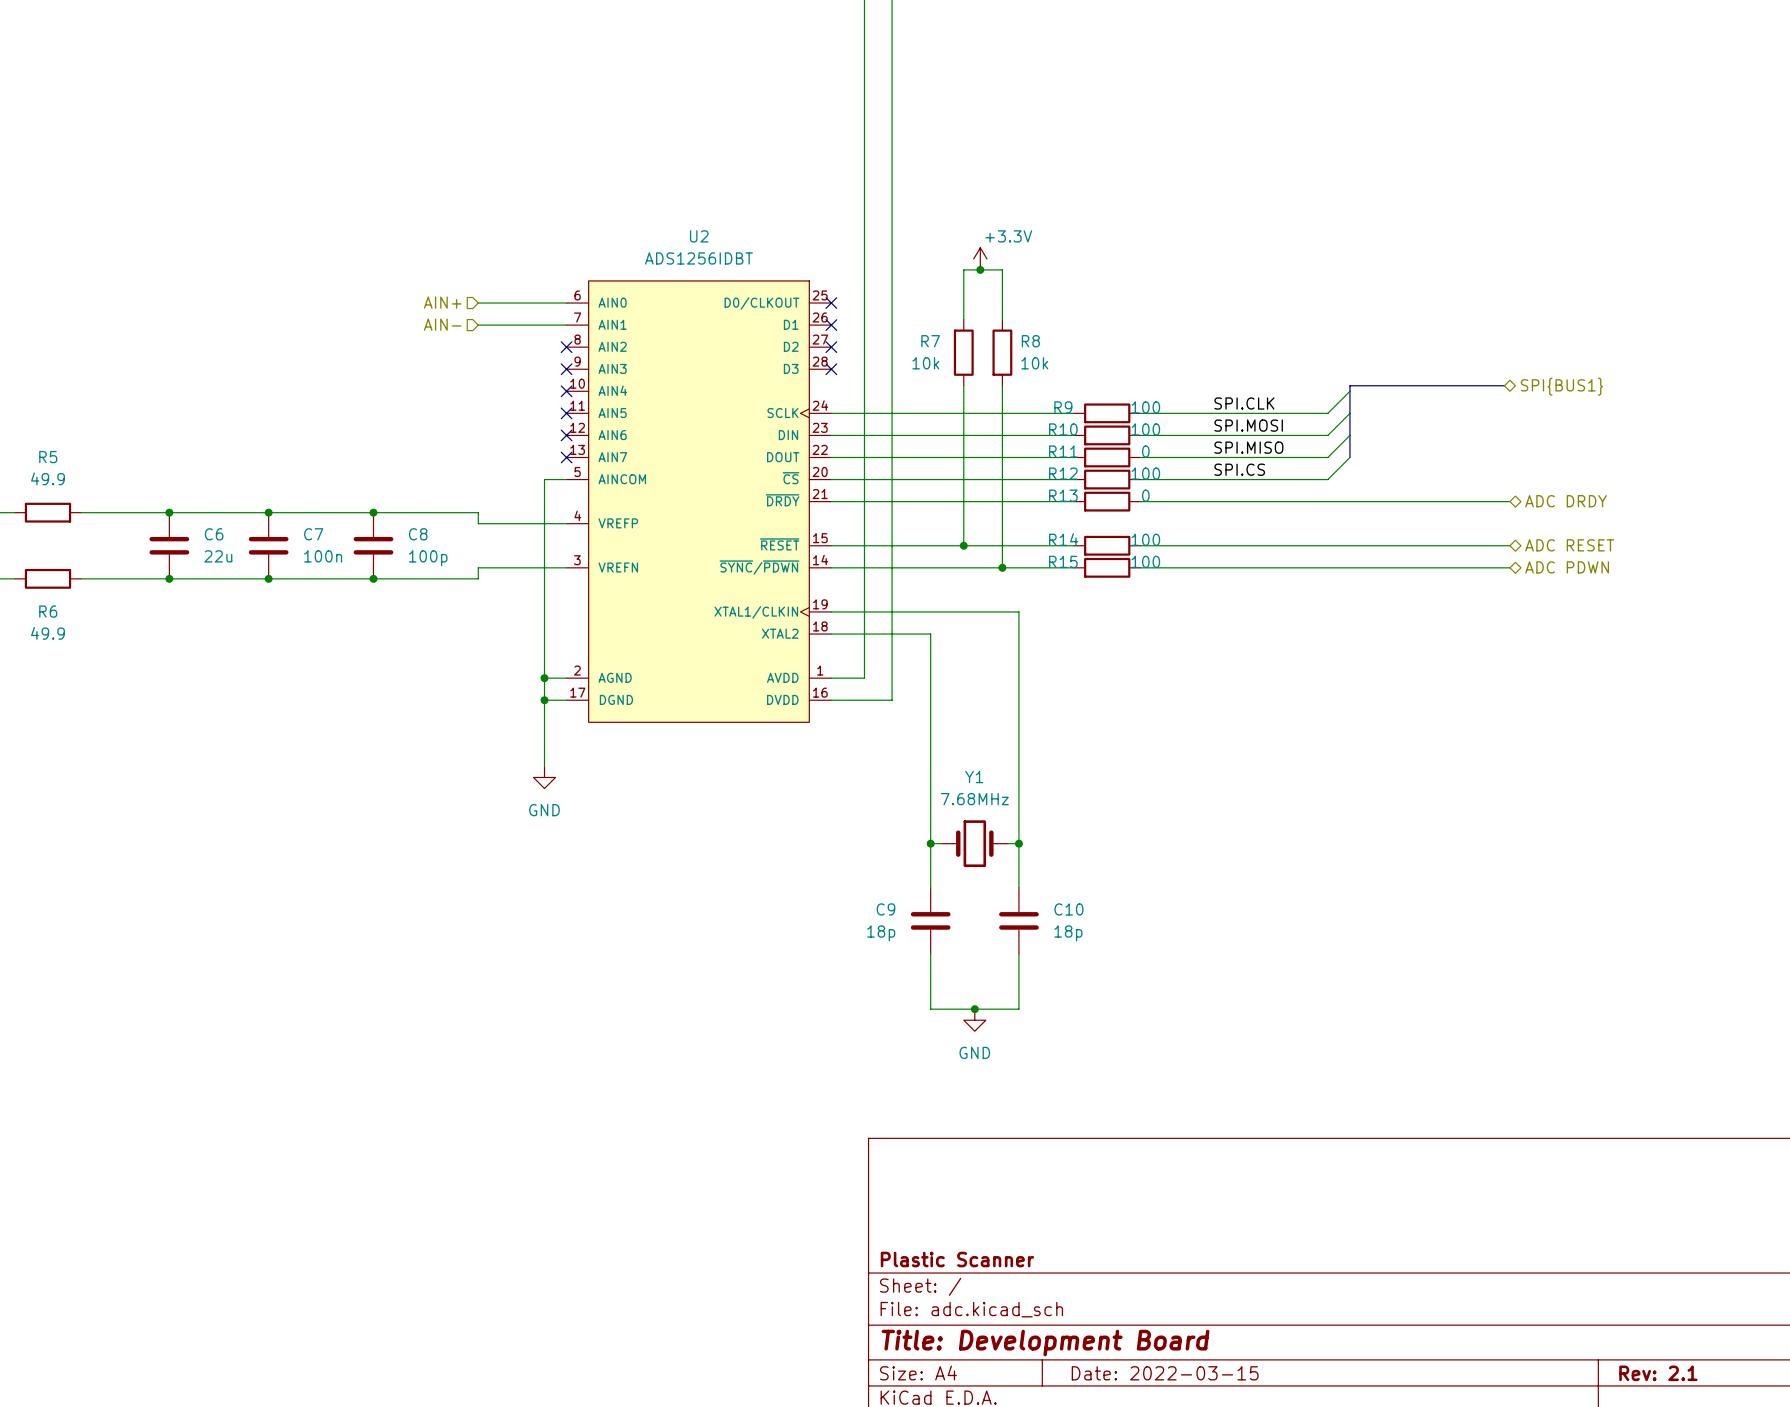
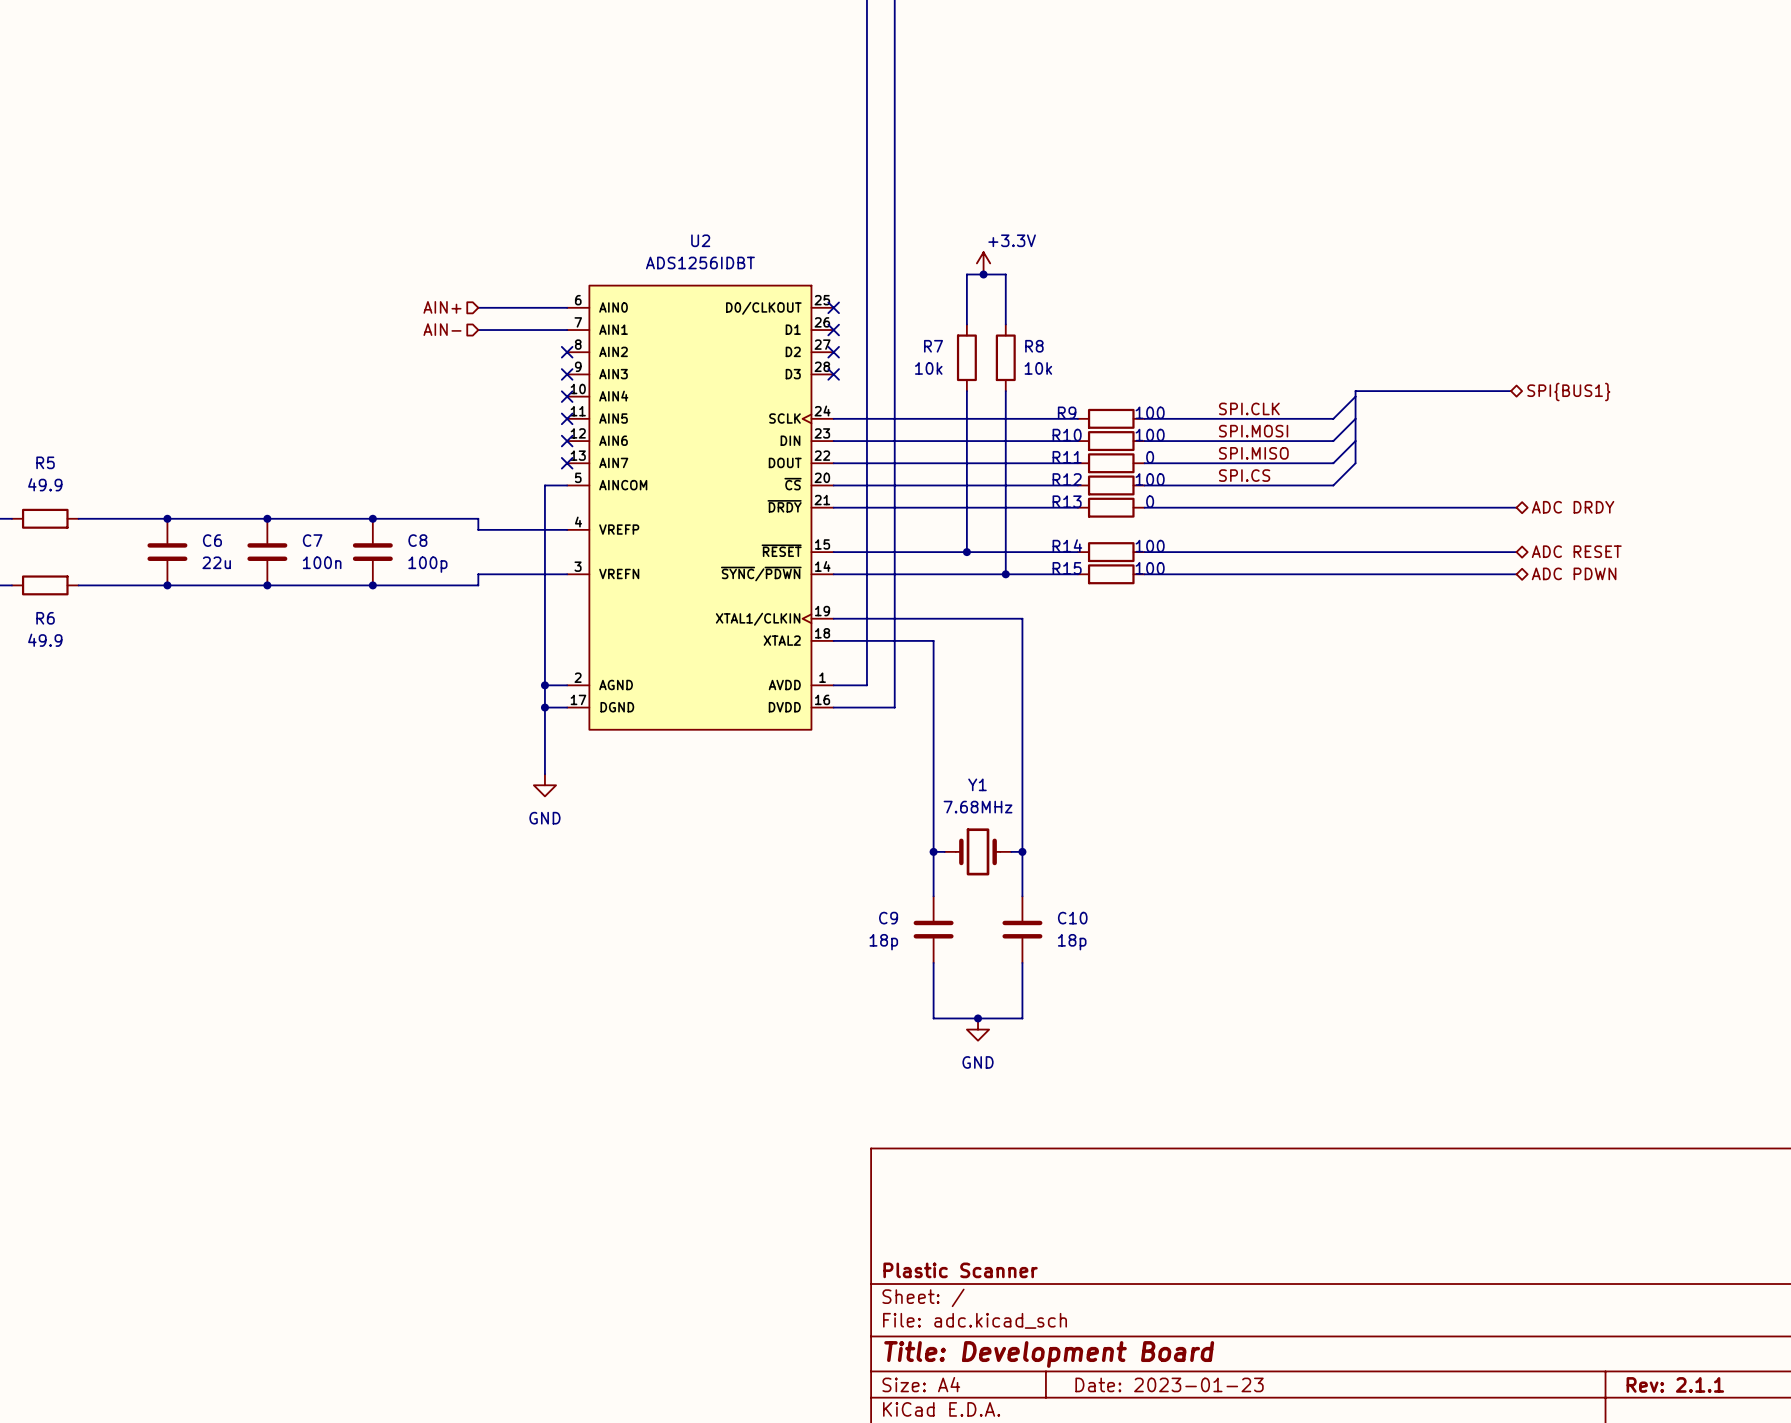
title block: Date: 2022-03-15 (1165, 1373) -> Date: 2023-01-23 (1169, 1384)
title block: Rev: 2.1 (1658, 1373) -> Rev: 2.1.1 (1675, 1384)

